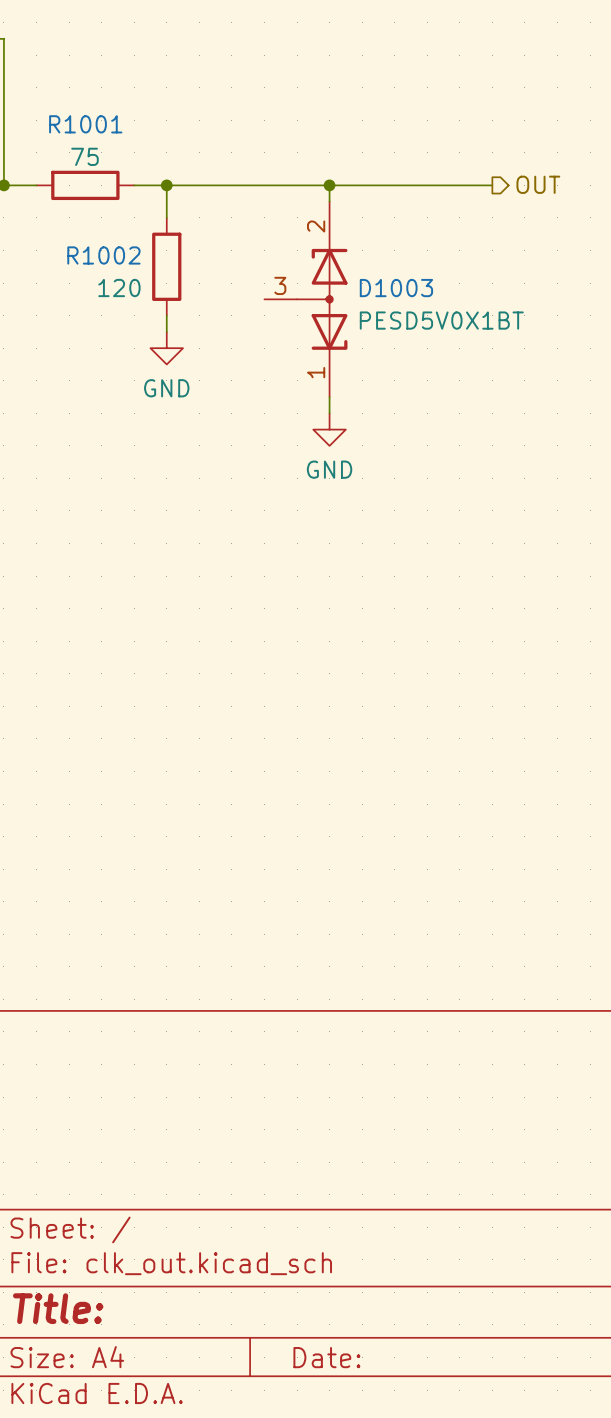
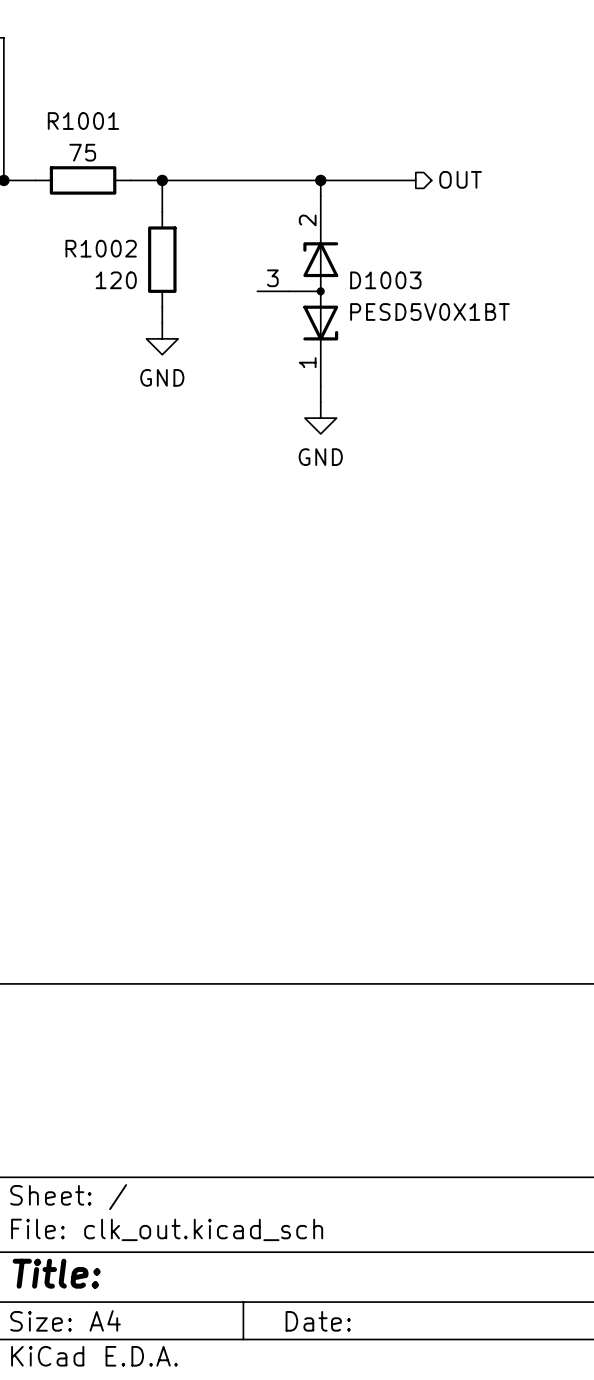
hierarchical label position: OUT (538, 184) -> OUT (460, 179)
wire: (427, 185) (492, 185) -> none

